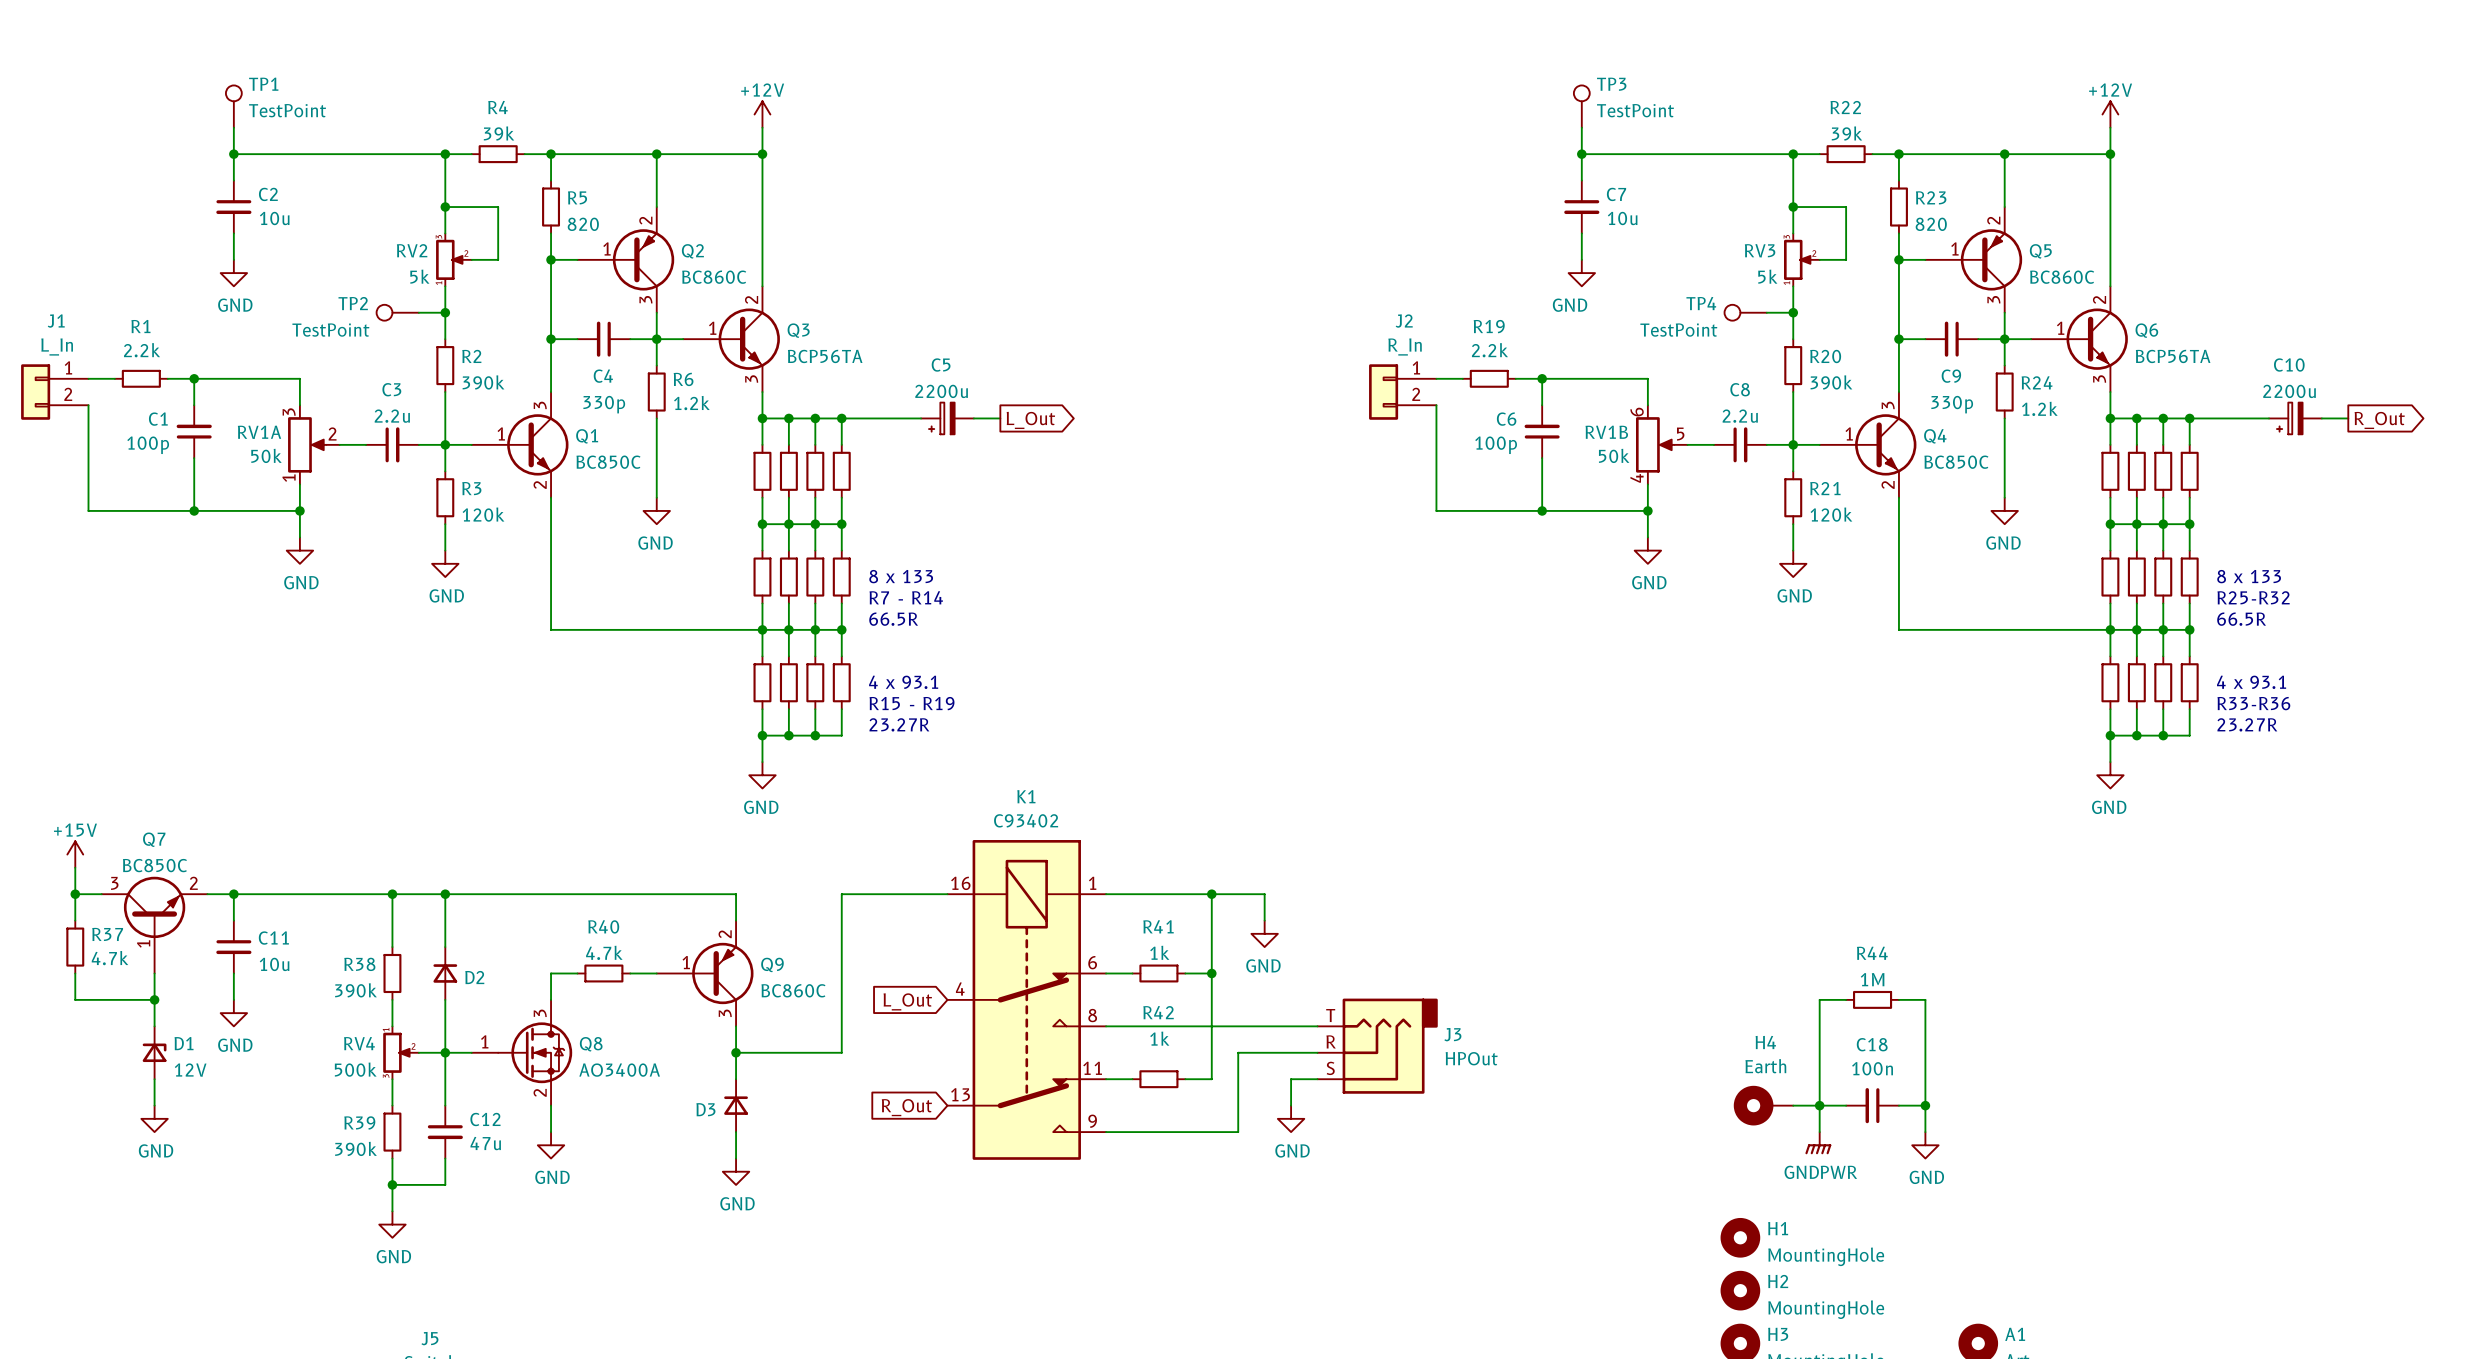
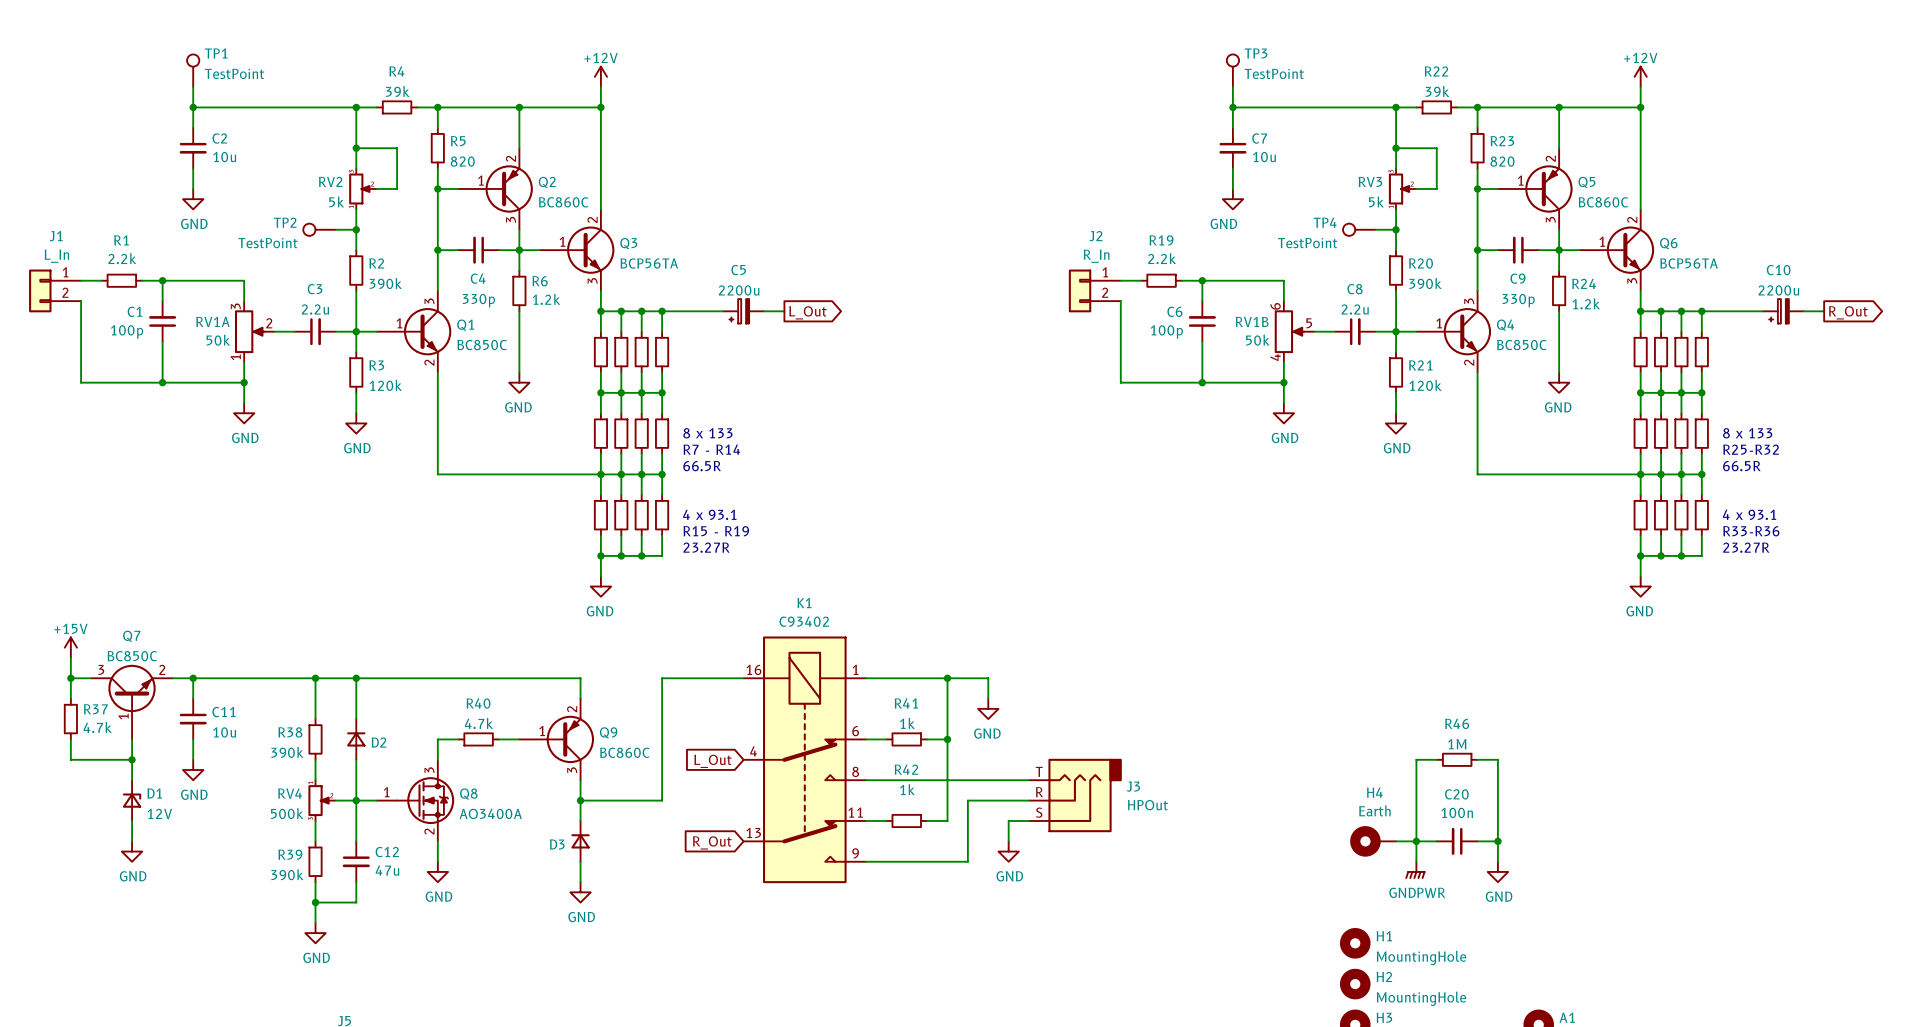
R44 name: R44 (1872, 953) -> R46 (1457, 723)
C18 name: C18 (1872, 1044) -> C20 (1456, 794)

